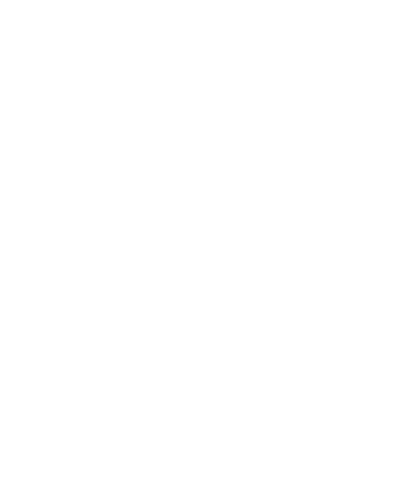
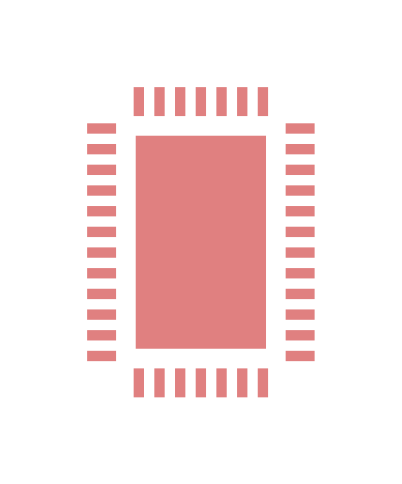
part: none -> (200, 242)

